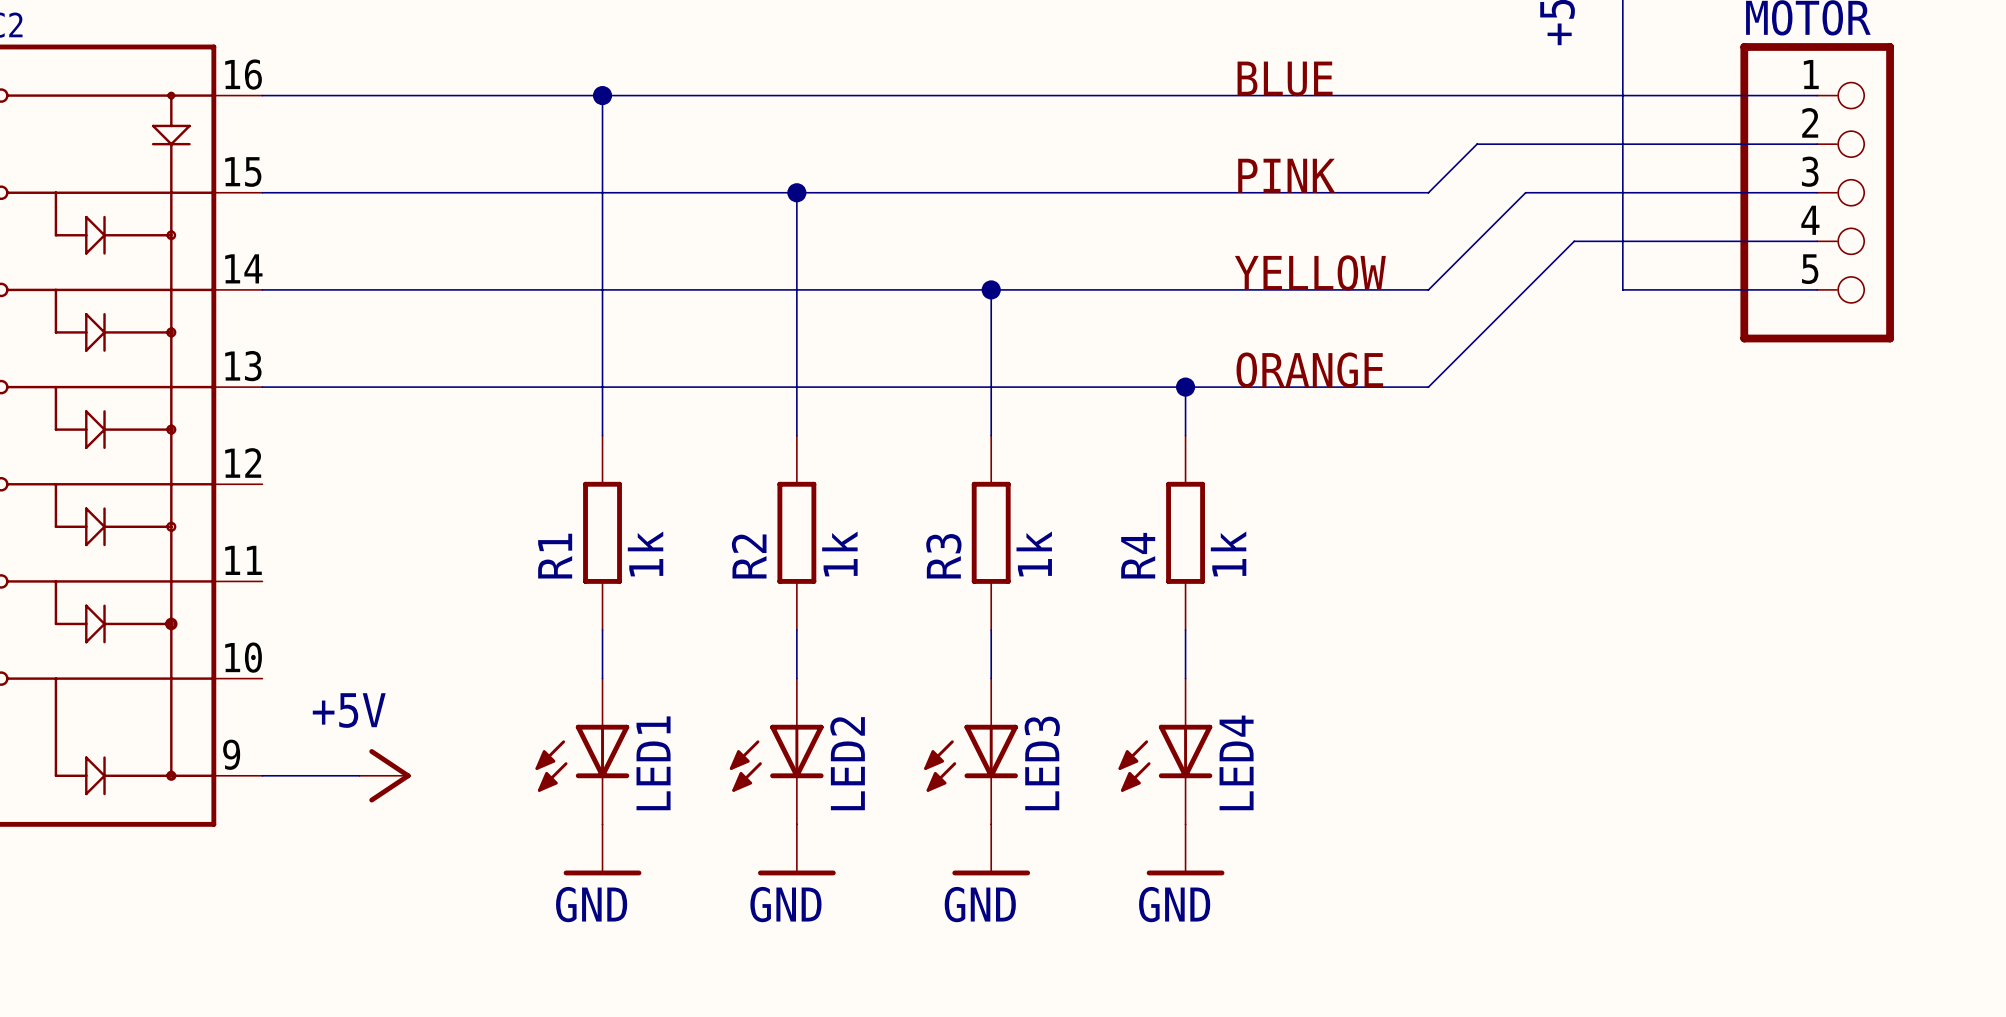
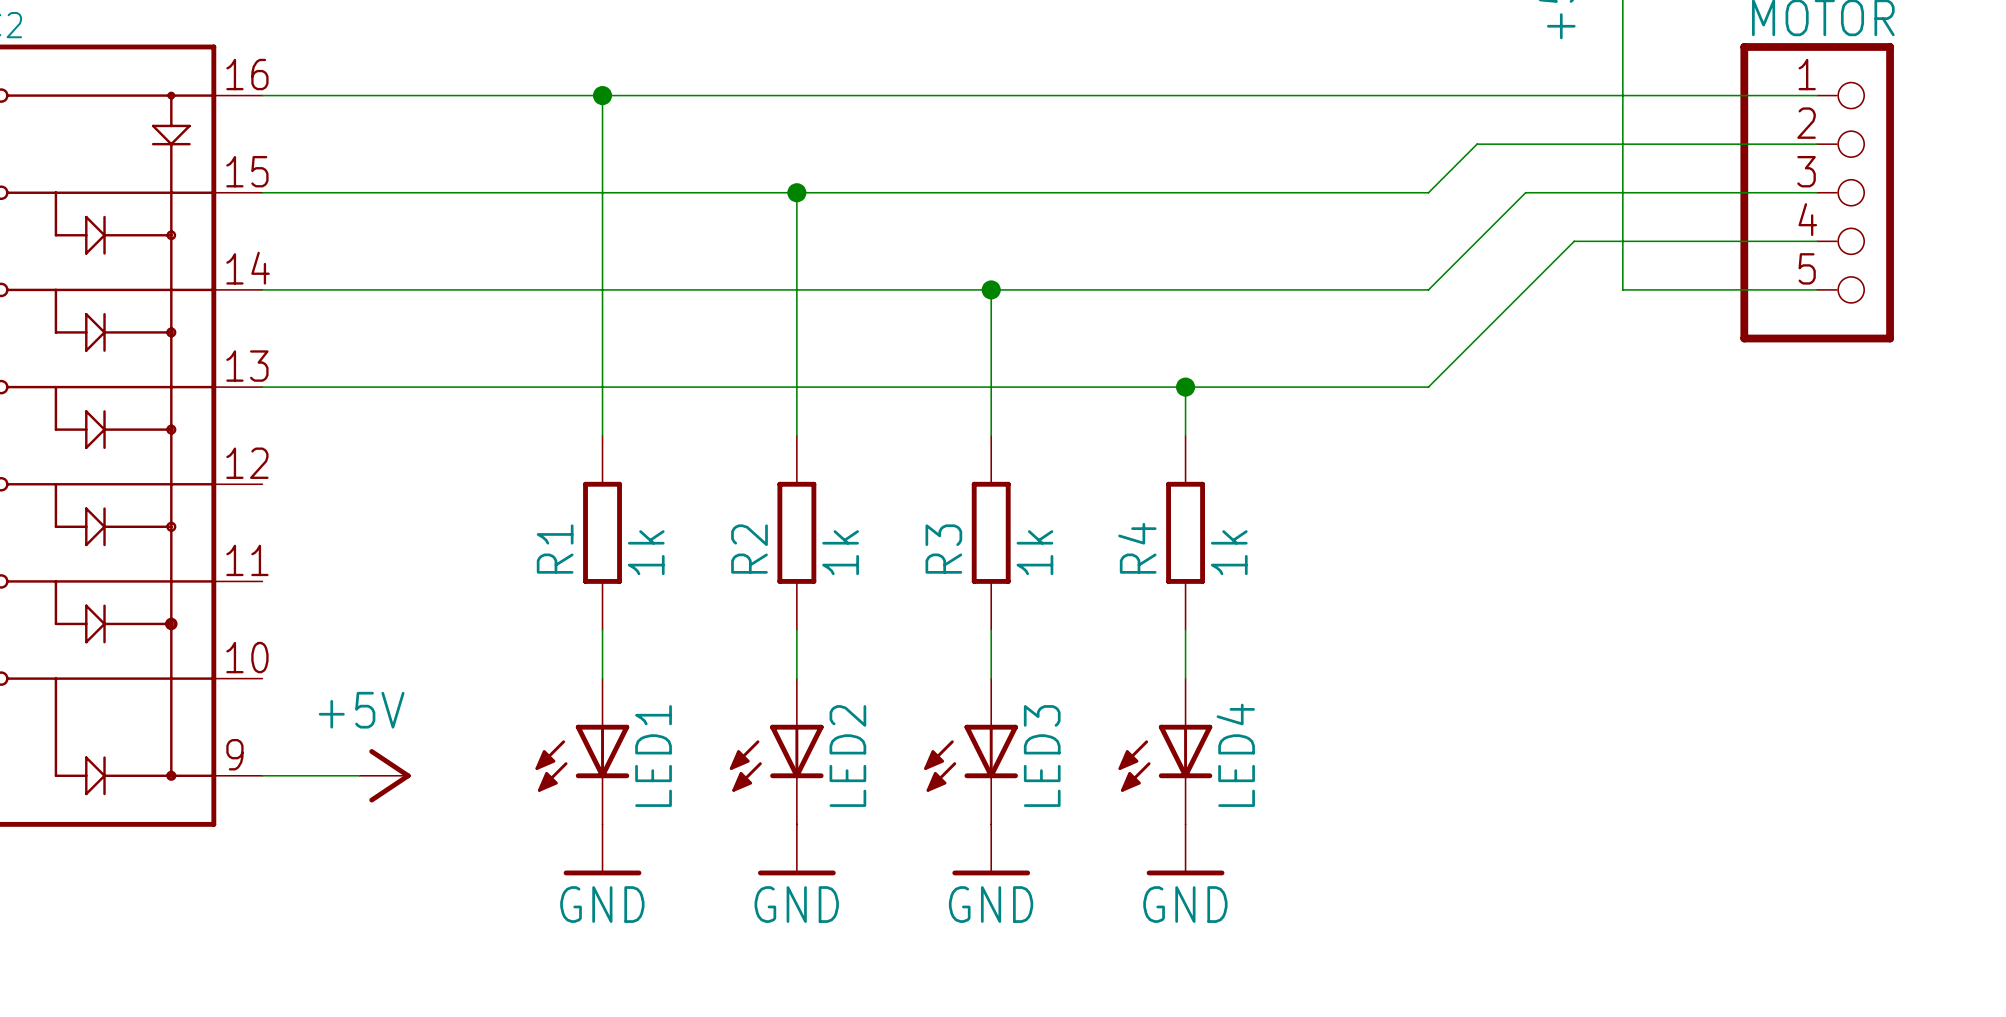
label: BLUE (1285, 78) -> none
label: PINK (1286, 175) -> none
label: YELLOW (1310, 272) -> none
label: ORANGE (1309, 370) -> none

